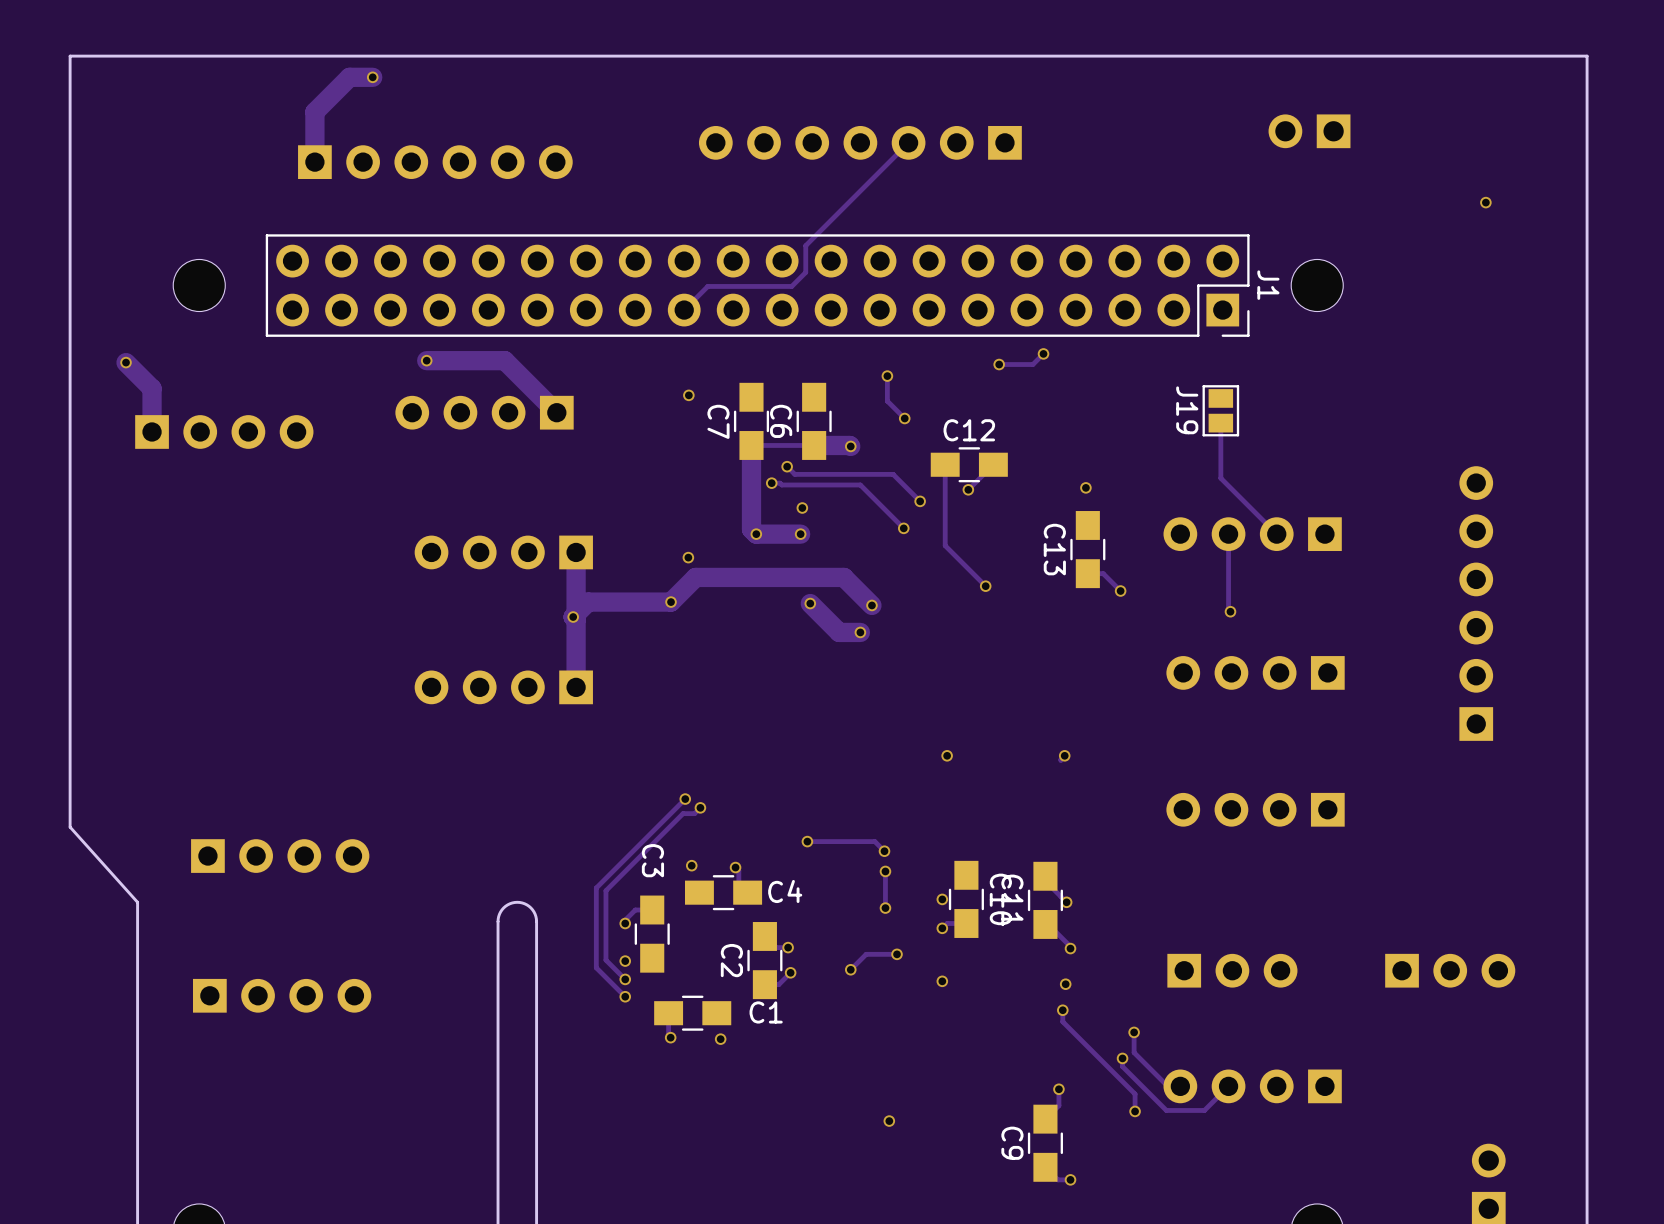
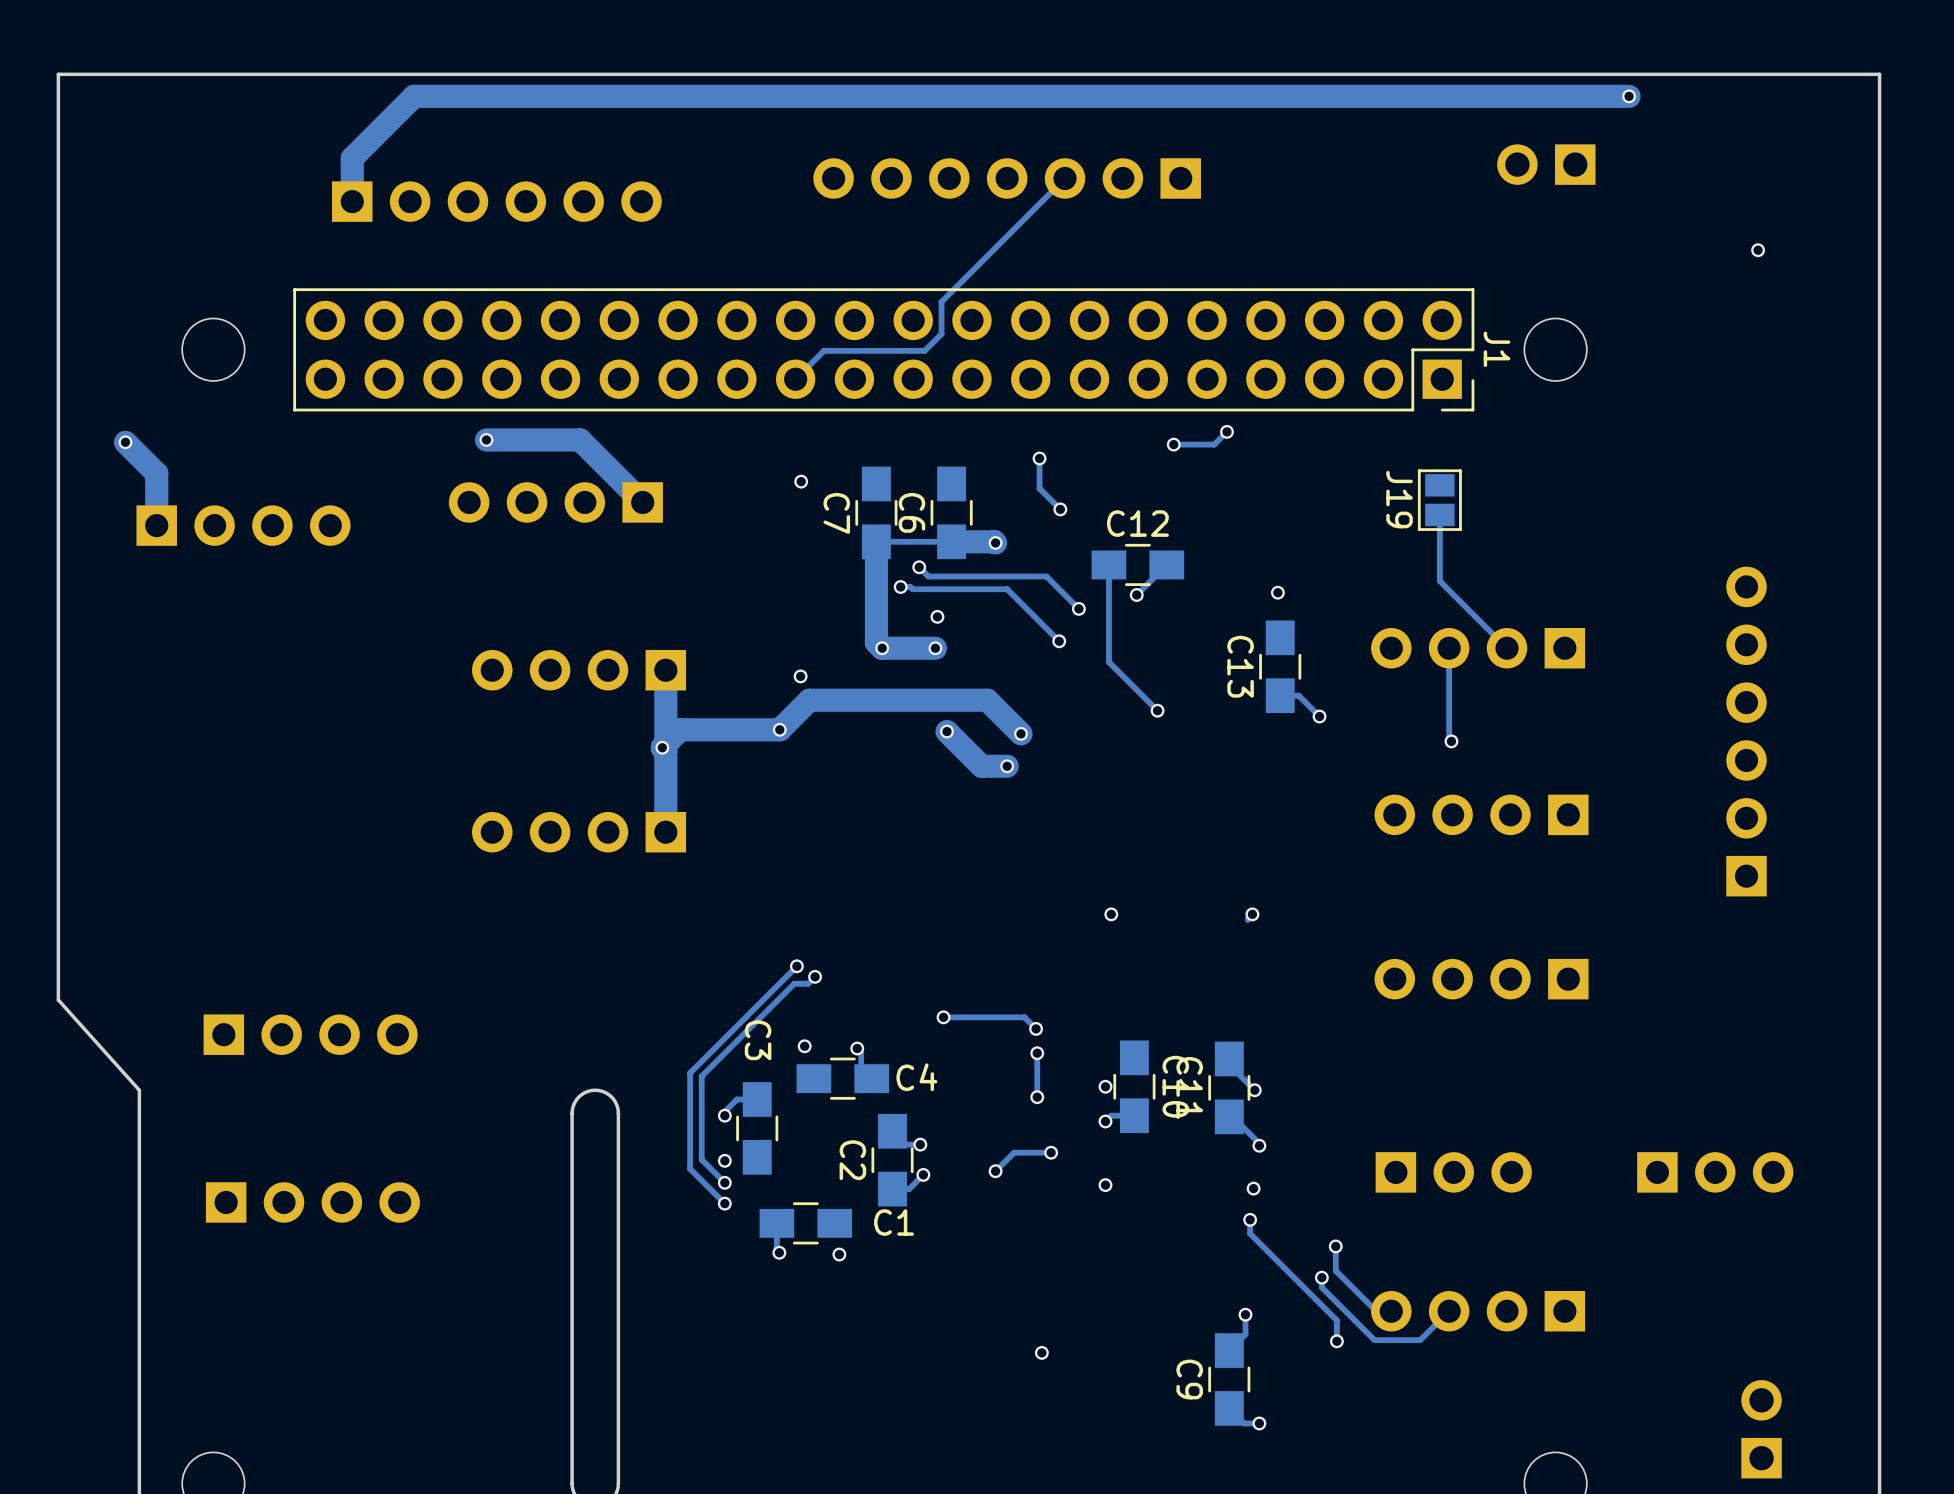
via: none -> (1629, 96)
track: (372, 77) (349, 77) (314, 112) (314, 125) -> (1629, 96) (414, 96) (352, 158)
via: (372, 77) -> none

